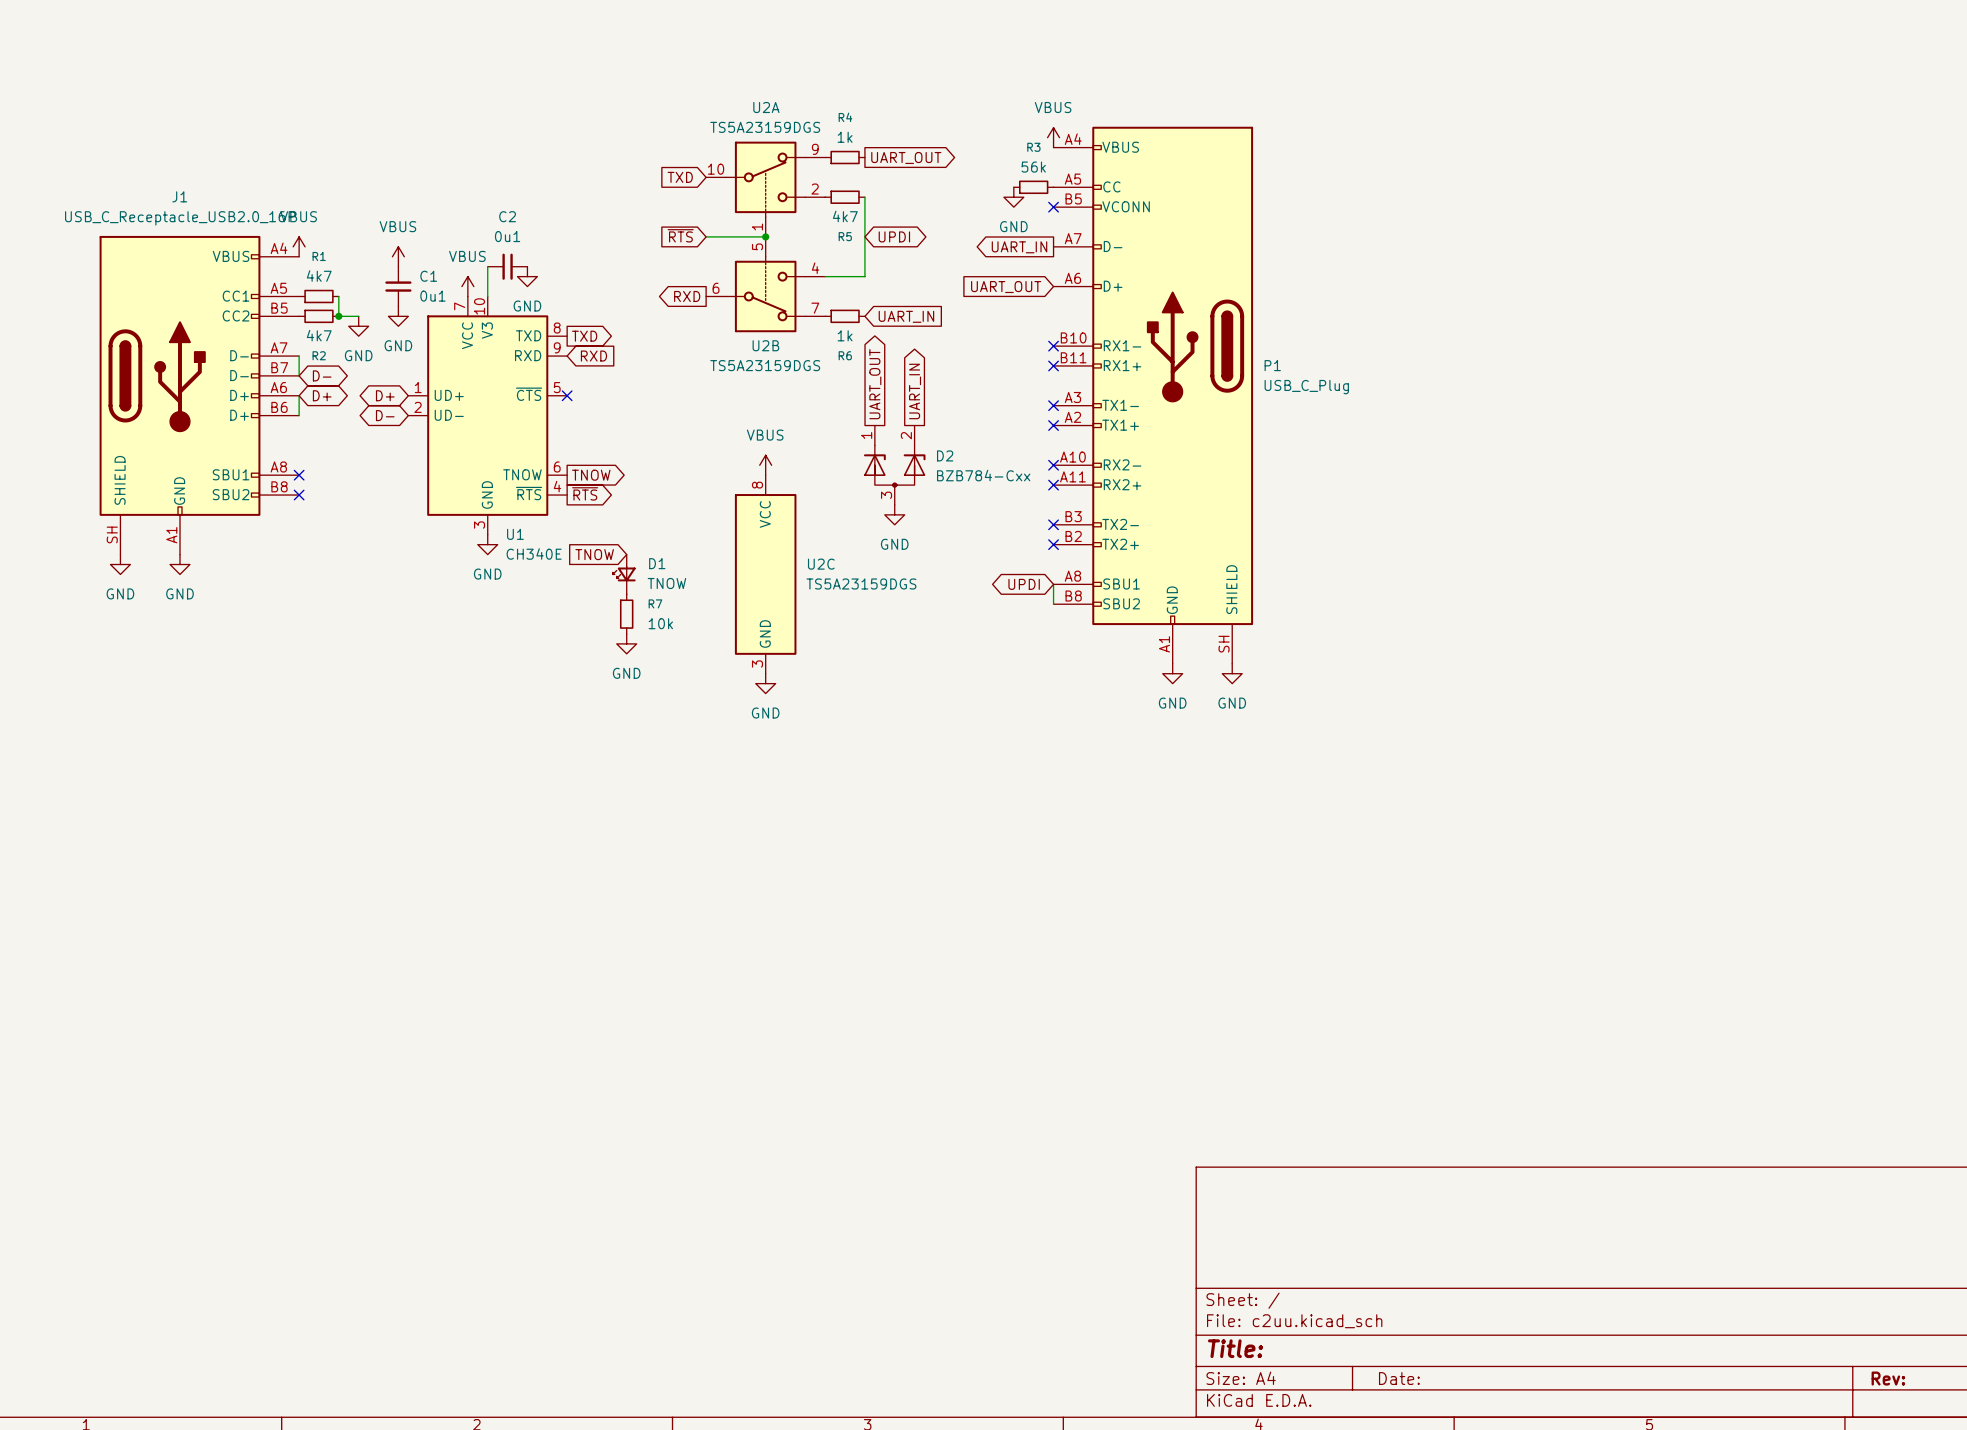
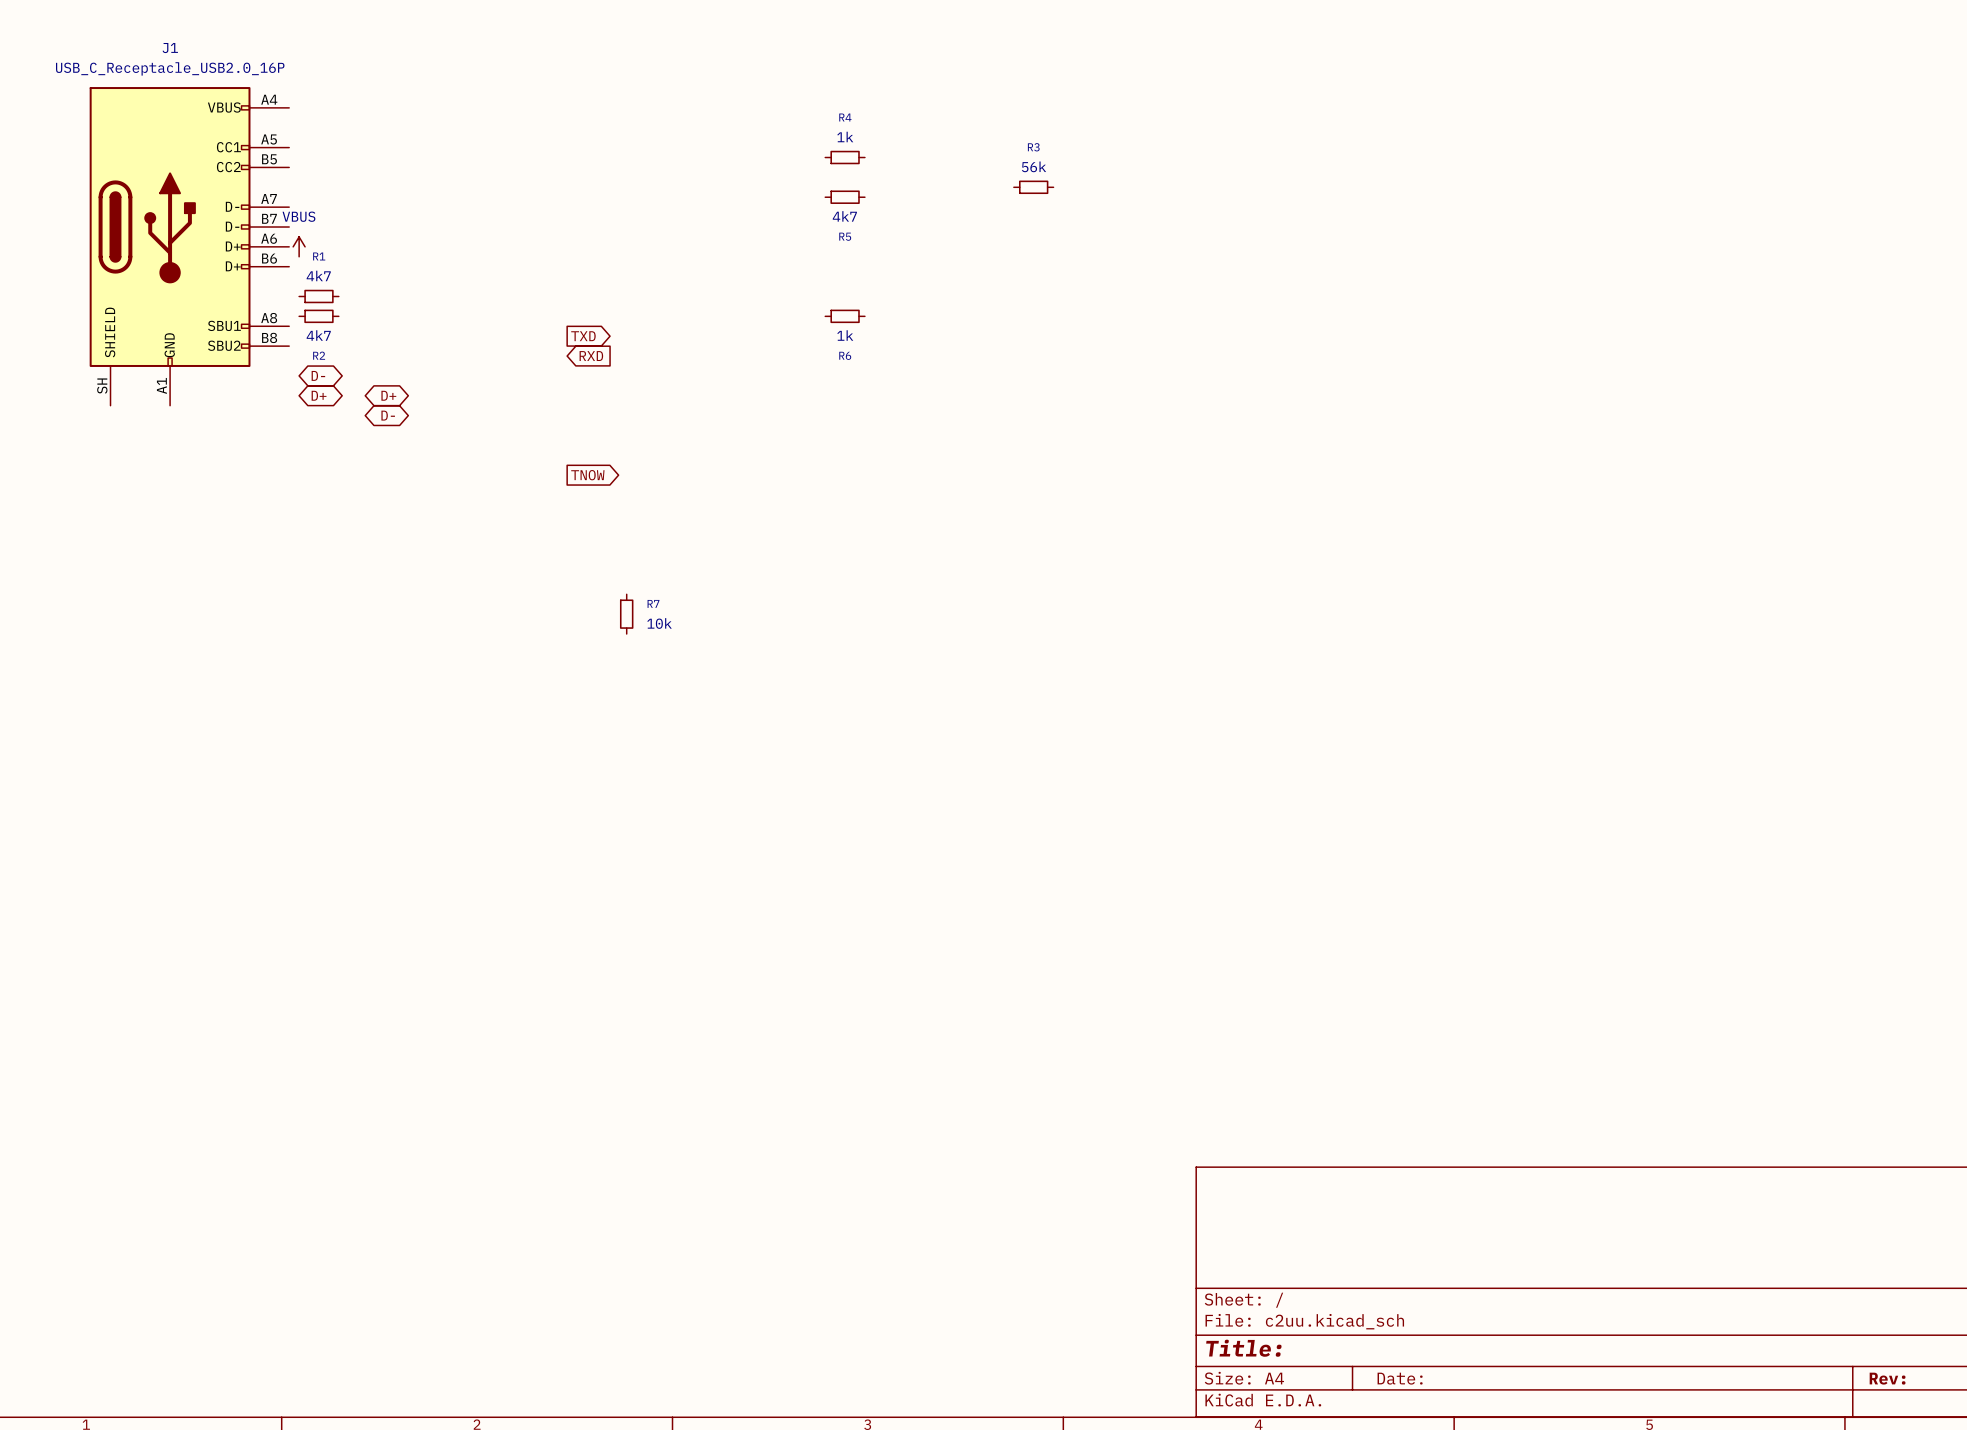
power symbol: VBUS (1053, 137) -> none
global label: UART_OUT (906, 157) -> none
global label: TXD (680, 177) -> none
U2A: TS5A23159DGS (765, 189) -> none
wire: (864, 197) (864, 276) (825, 276) -> none
power symbol: GND (1013, 197) -> none
no-connect mark: (1053, 207) -> none
global label: ~{RTS} (680, 235) -> none
wire: (706, 236) (765, 236) -> none
junction: (765, 236) -> none
global label: UPDI (894, 236) -> none
global label: UART_IN (1019, 247) -> none
power symbol: VBUS (398, 256) -> none
wire: (487, 266) (487, 296) -> none
C2: 0u1 (507, 266) -> none
power symbol: GND (527, 276) -> none
U2B: TS5A23159DGS (765, 284) -> none
C1: 0u1 (398, 286) -> none
power symbol: VBUS (467, 286) -> none
global label: UART_OUT (1006, 287) -> none
wire: (338, 296) (338, 316) (358, 316) -> none
global label: RXD (687, 296) -> none
junction: (338, 316) -> none
power symbol: GND (398, 316) -> none
global label: UART_IN (906, 316) -> none
power symbol: GND (358, 326) -> none
no-connect mark: (1053, 346) -> none
wire: (299, 356) (299, 375) -> none
no-connect mark: (1053, 365) -> none
global label: UART_OUT (875, 384) -> none
global label: UART_IN (915, 391) -> none
J1 position: (199, 395) -> (189, 246)
wire: (299, 395) (299, 415) -> none
no-connect mark: (567, 395) -> none
P1: USB_C_Plug (1153, 395) -> none
no-connect mark: (1053, 405) -> none
U1: CH340E (487, 415) -> none
no-connect mark: (1053, 425) -> none
power symbol: VBUS (765, 465) -> none
D2: BZB784-Cxx (894, 465) -> none
no-connect mark: (1053, 465) -> none
no-connect mark: (299, 475) -> none
no-connect mark: (1053, 485) -> none
global label: ~{RTS} (585, 493) -> none
no-connect mark: (299, 495) -> none
power symbol: GND (894, 514) -> none
no-connect mark: (1053, 524) -> none
power symbol: GND (487, 544) -> none
no-connect mark: (1053, 544) -> none
global label: TNOW (594, 554) -> none
power symbol: GND (120, 564) -> none
power symbol: GND (180, 564) -> none
D1: TNOW (624, 574) -> none
U2C: TS5A23159DGS (765, 574) -> none
global label: UPDI (1024, 584) -> none
wire: (1053, 584) (1053, 604) -> none
power symbol: GND (626, 643) -> none
power symbol: GND (1172, 673) -> none
power symbol: GND (1232, 673) -> none
power symbol: GND (765, 683) -> none

